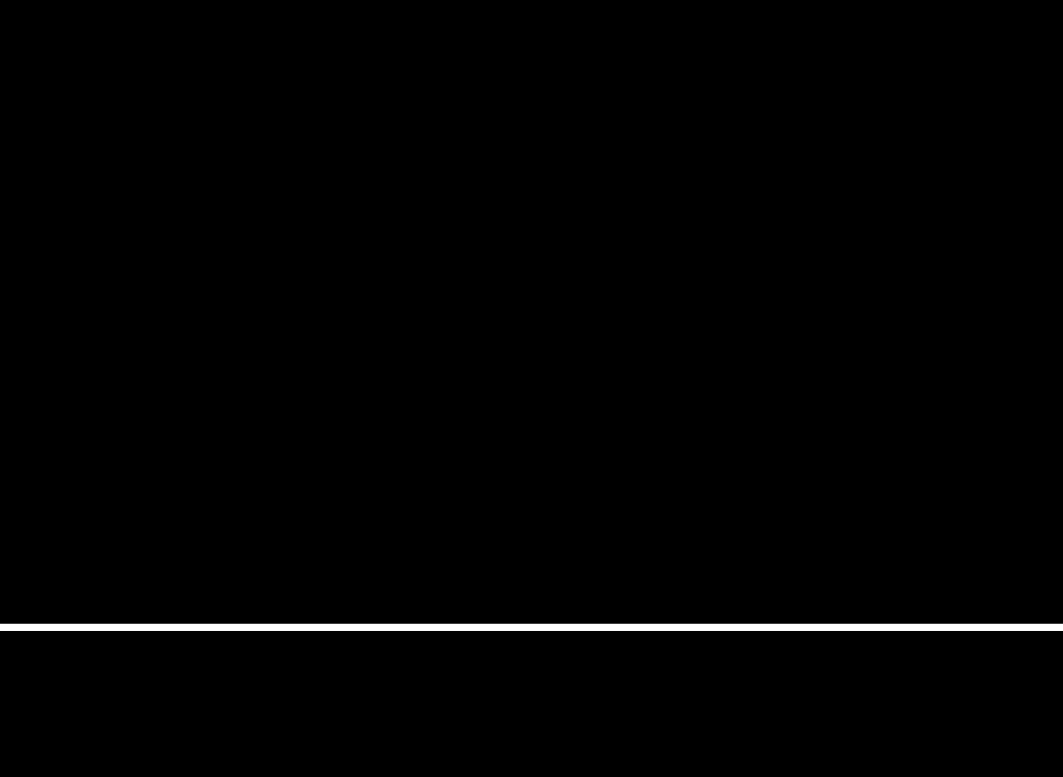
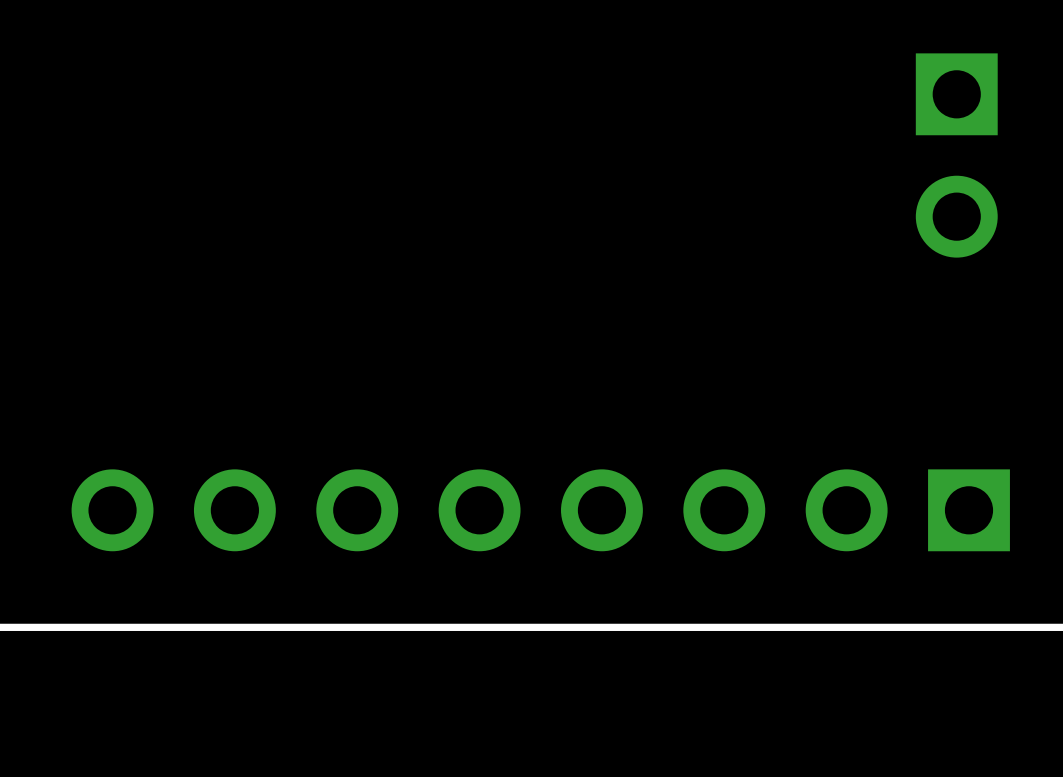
part: none -> (956, 155)
part: none -> (540, 510)

